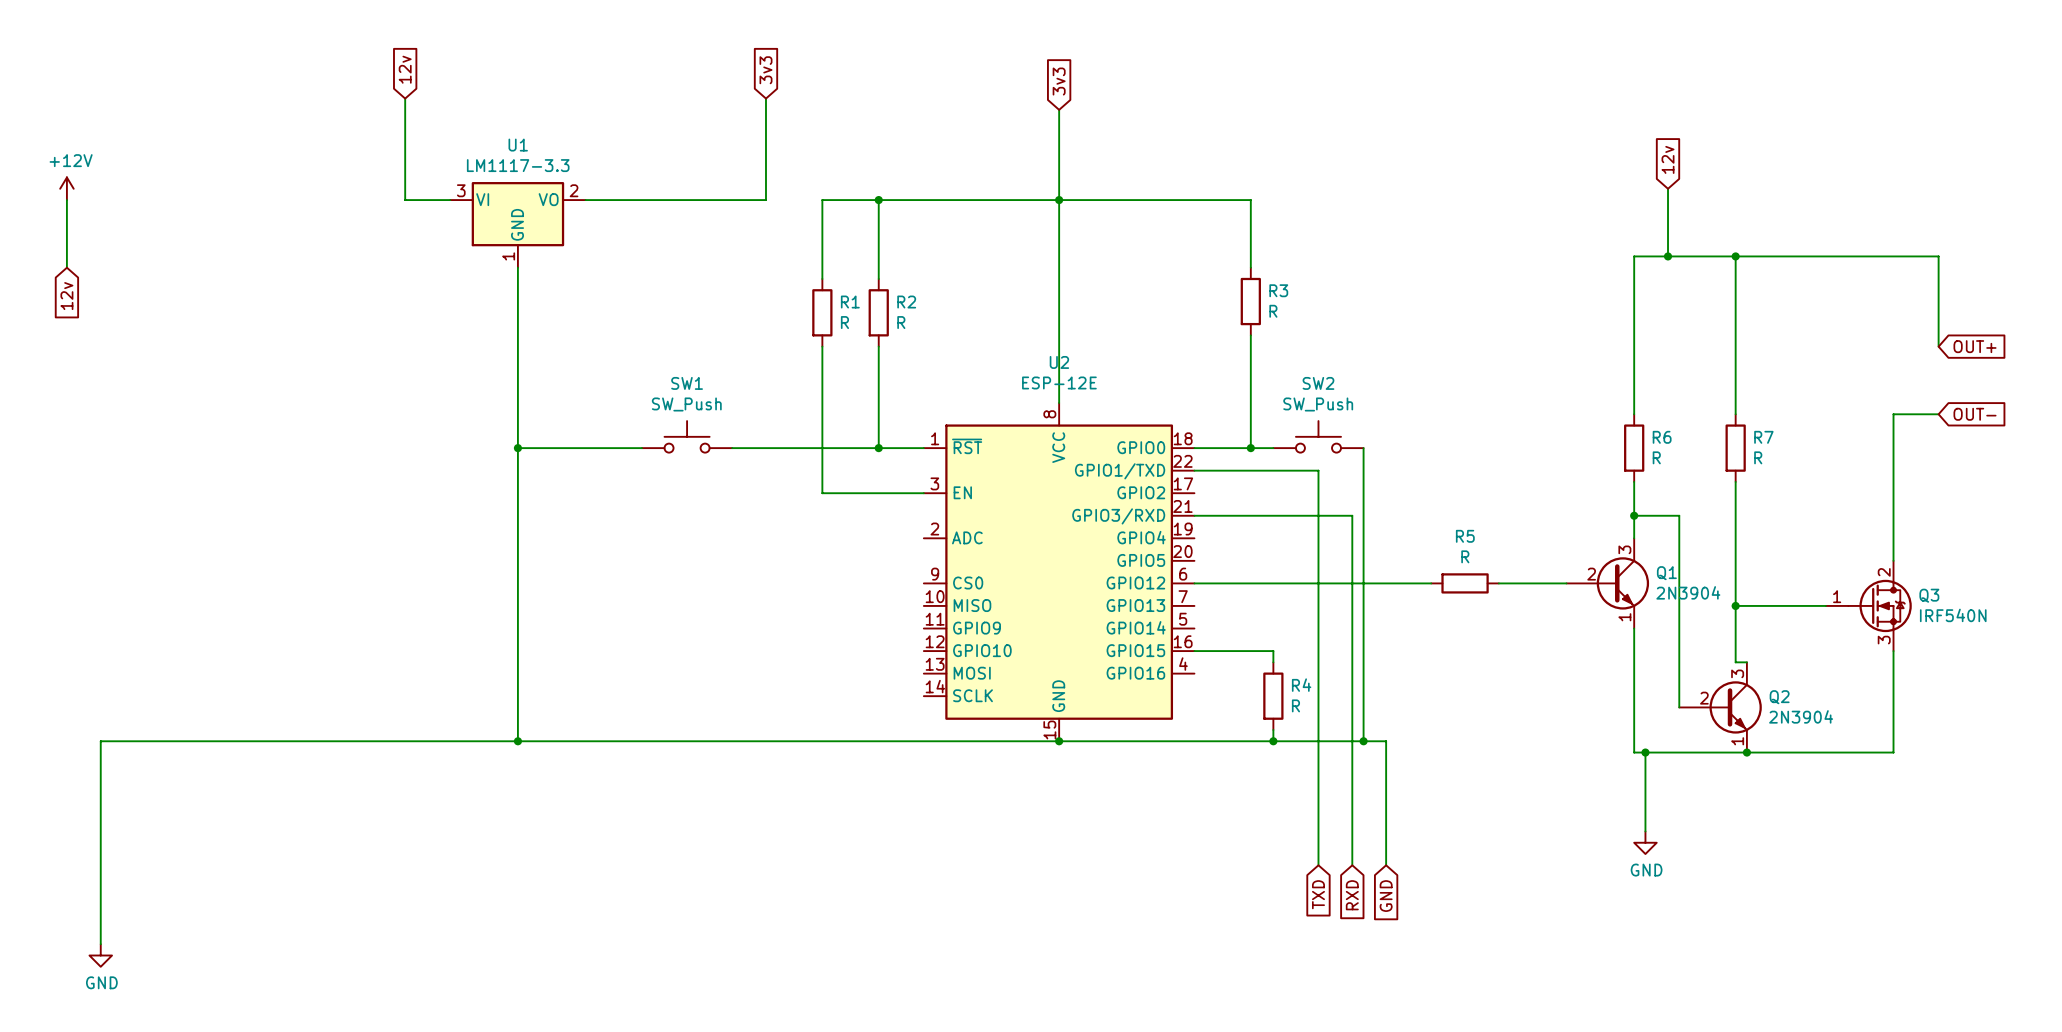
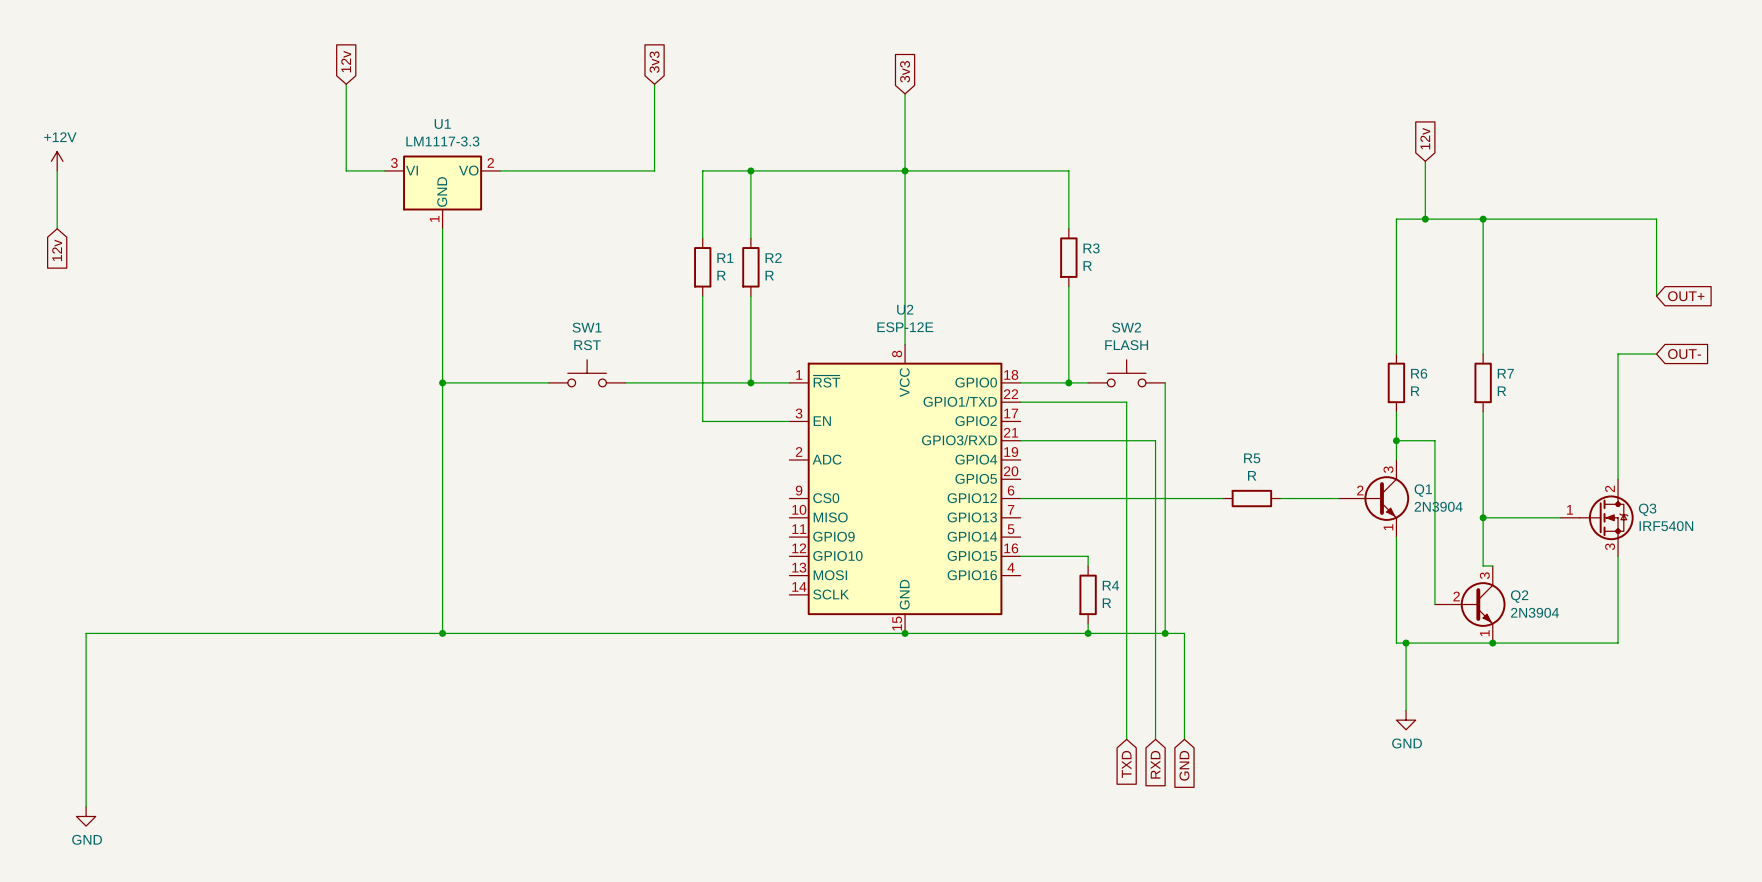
SW1 value: SW_Push (686, 404) -> RST (587, 345)
SW2 value: SW_Push (1318, 404) -> FLASH (1126, 345)

